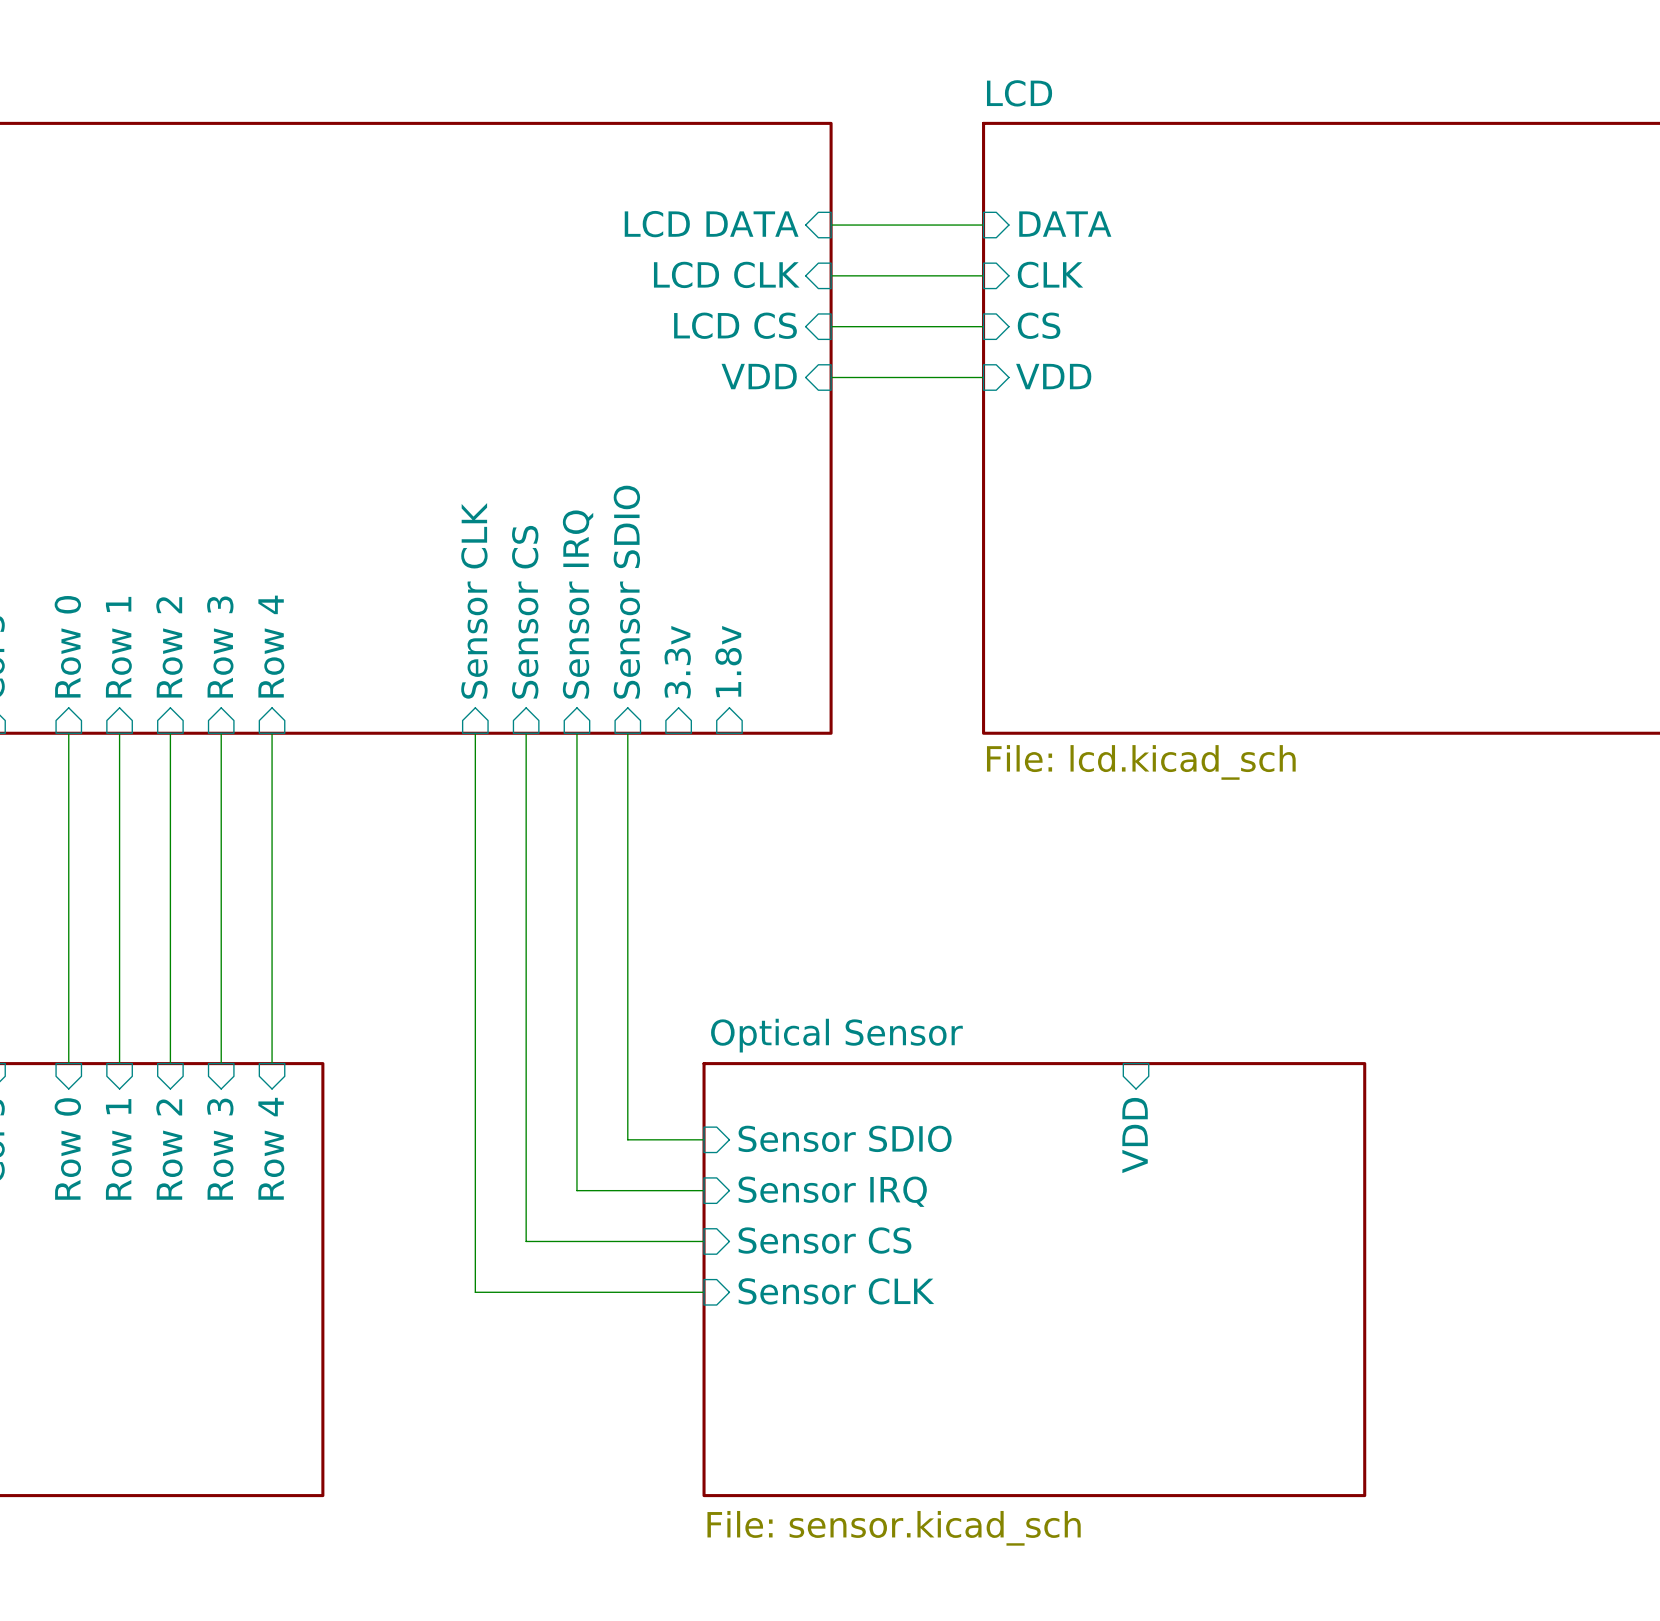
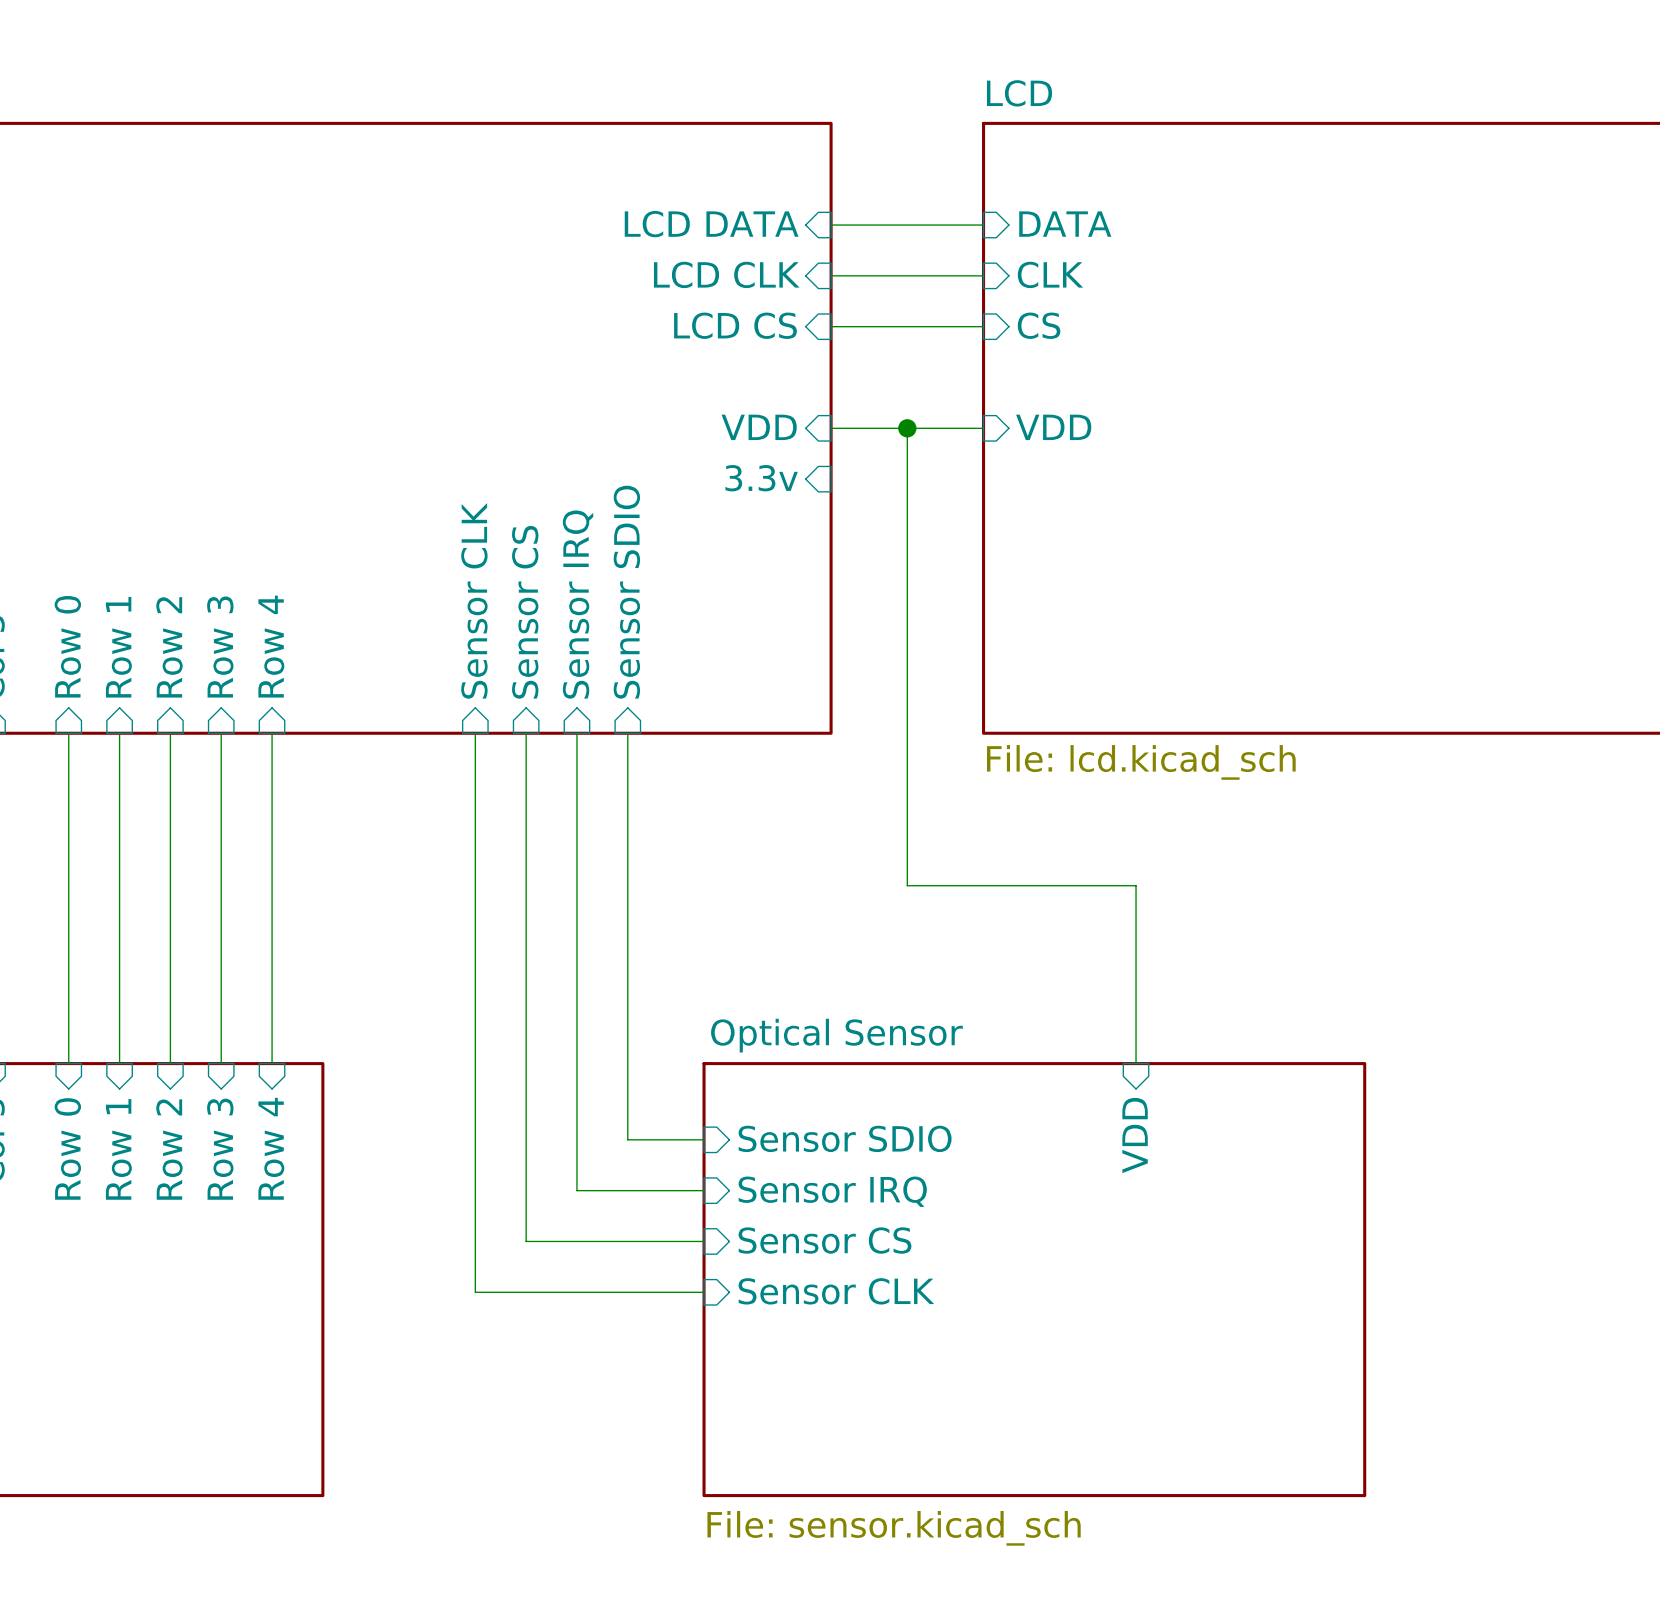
sheet pin position: VDD (759, 376) -> VDD (759, 427)
sheet pin position: VDD (1053, 376) -> VDD (1053, 427)
wire: (831, 377) (983, 377) -> (831, 428) (983, 428)
wire: none -> (907, 428) (907, 885) (1136, 885) (1136, 1063)
junction: none -> (907, 428)
sheet pin: 1.8v (728, 661) -> none
sheet pin rotation: 0° (677, 662) -> 90° counterclockwise (761, 478)
sheet pin position: 3.3v (677, 662) -> 3.3v (761, 478)

